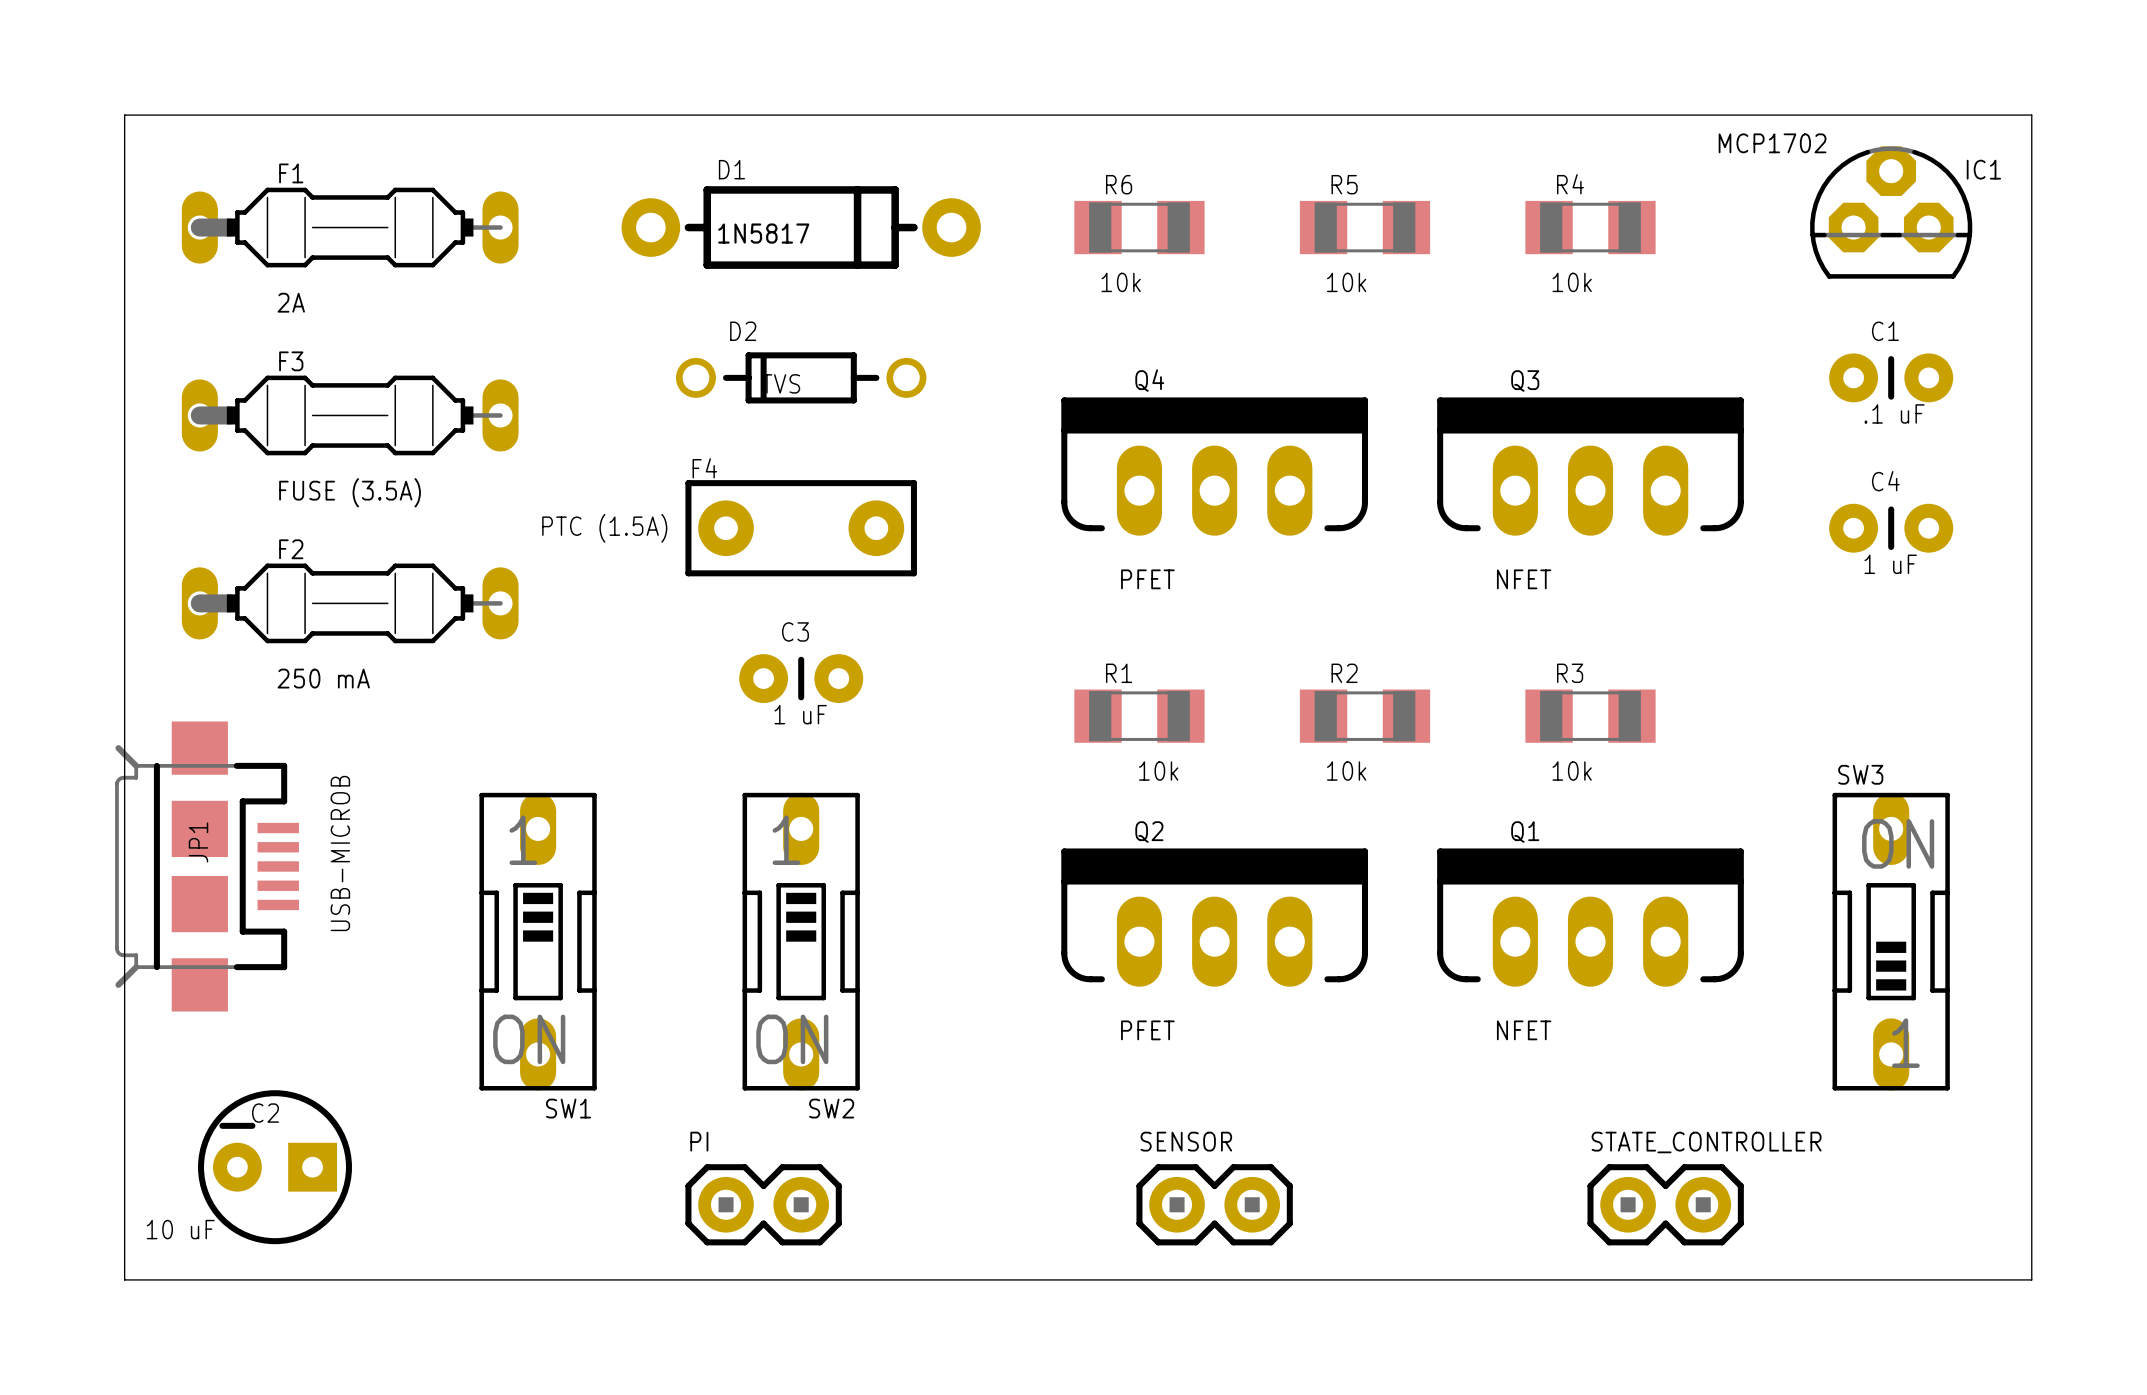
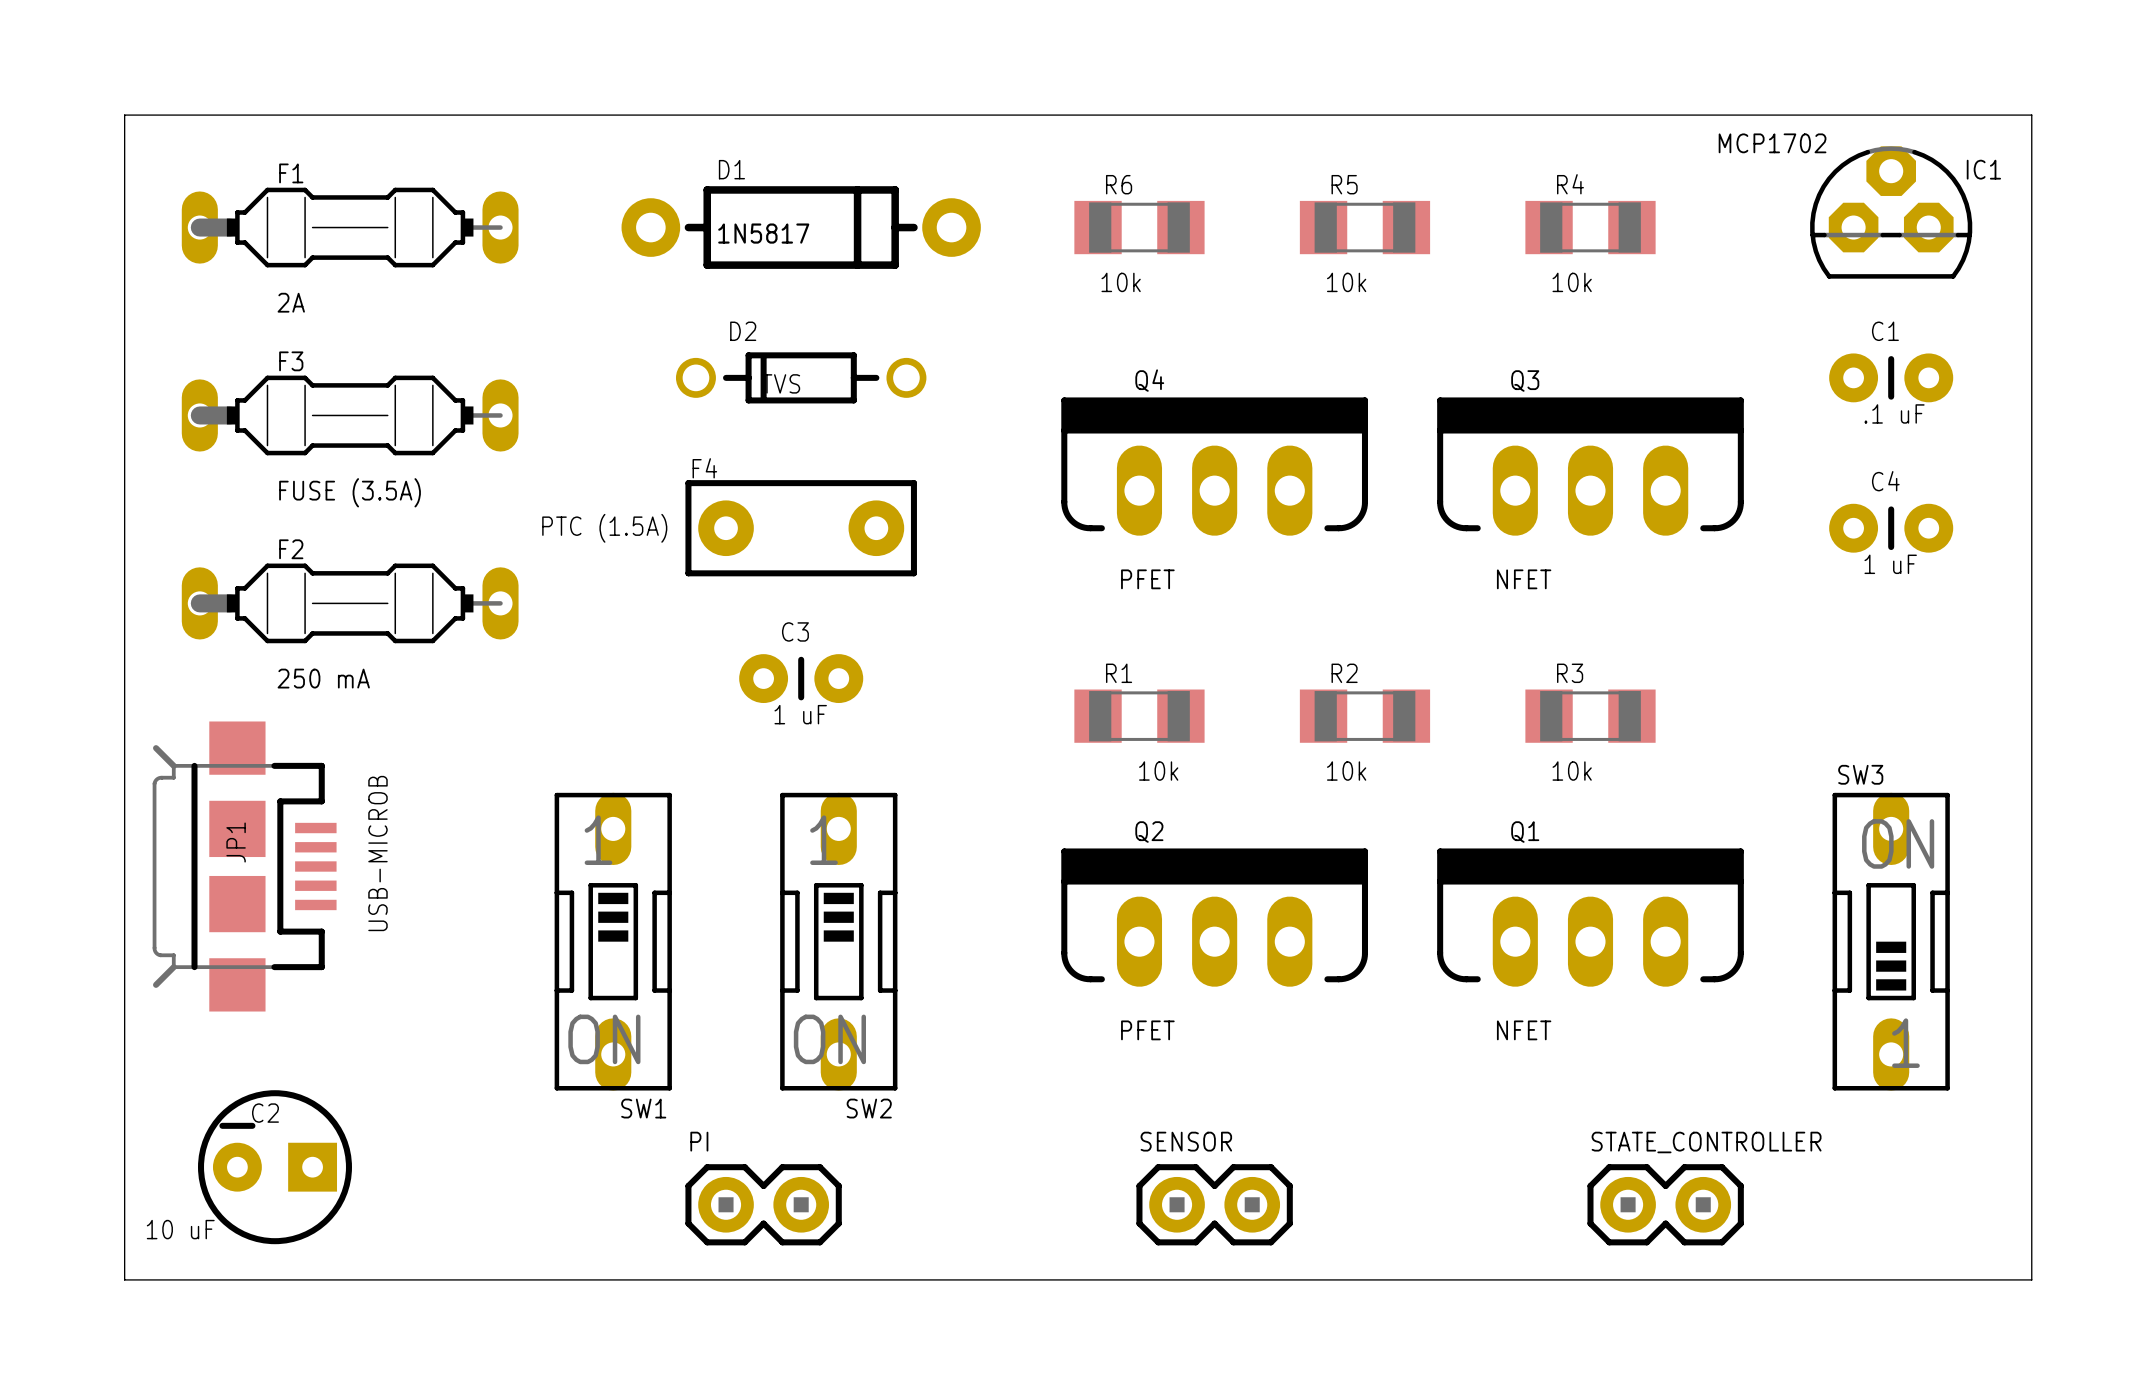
JP1 position: (207, 866) -> (244, 866)
SW1 position: (538, 941) -> (613, 941)
SW2 position: (801, 941) -> (838, 941)

